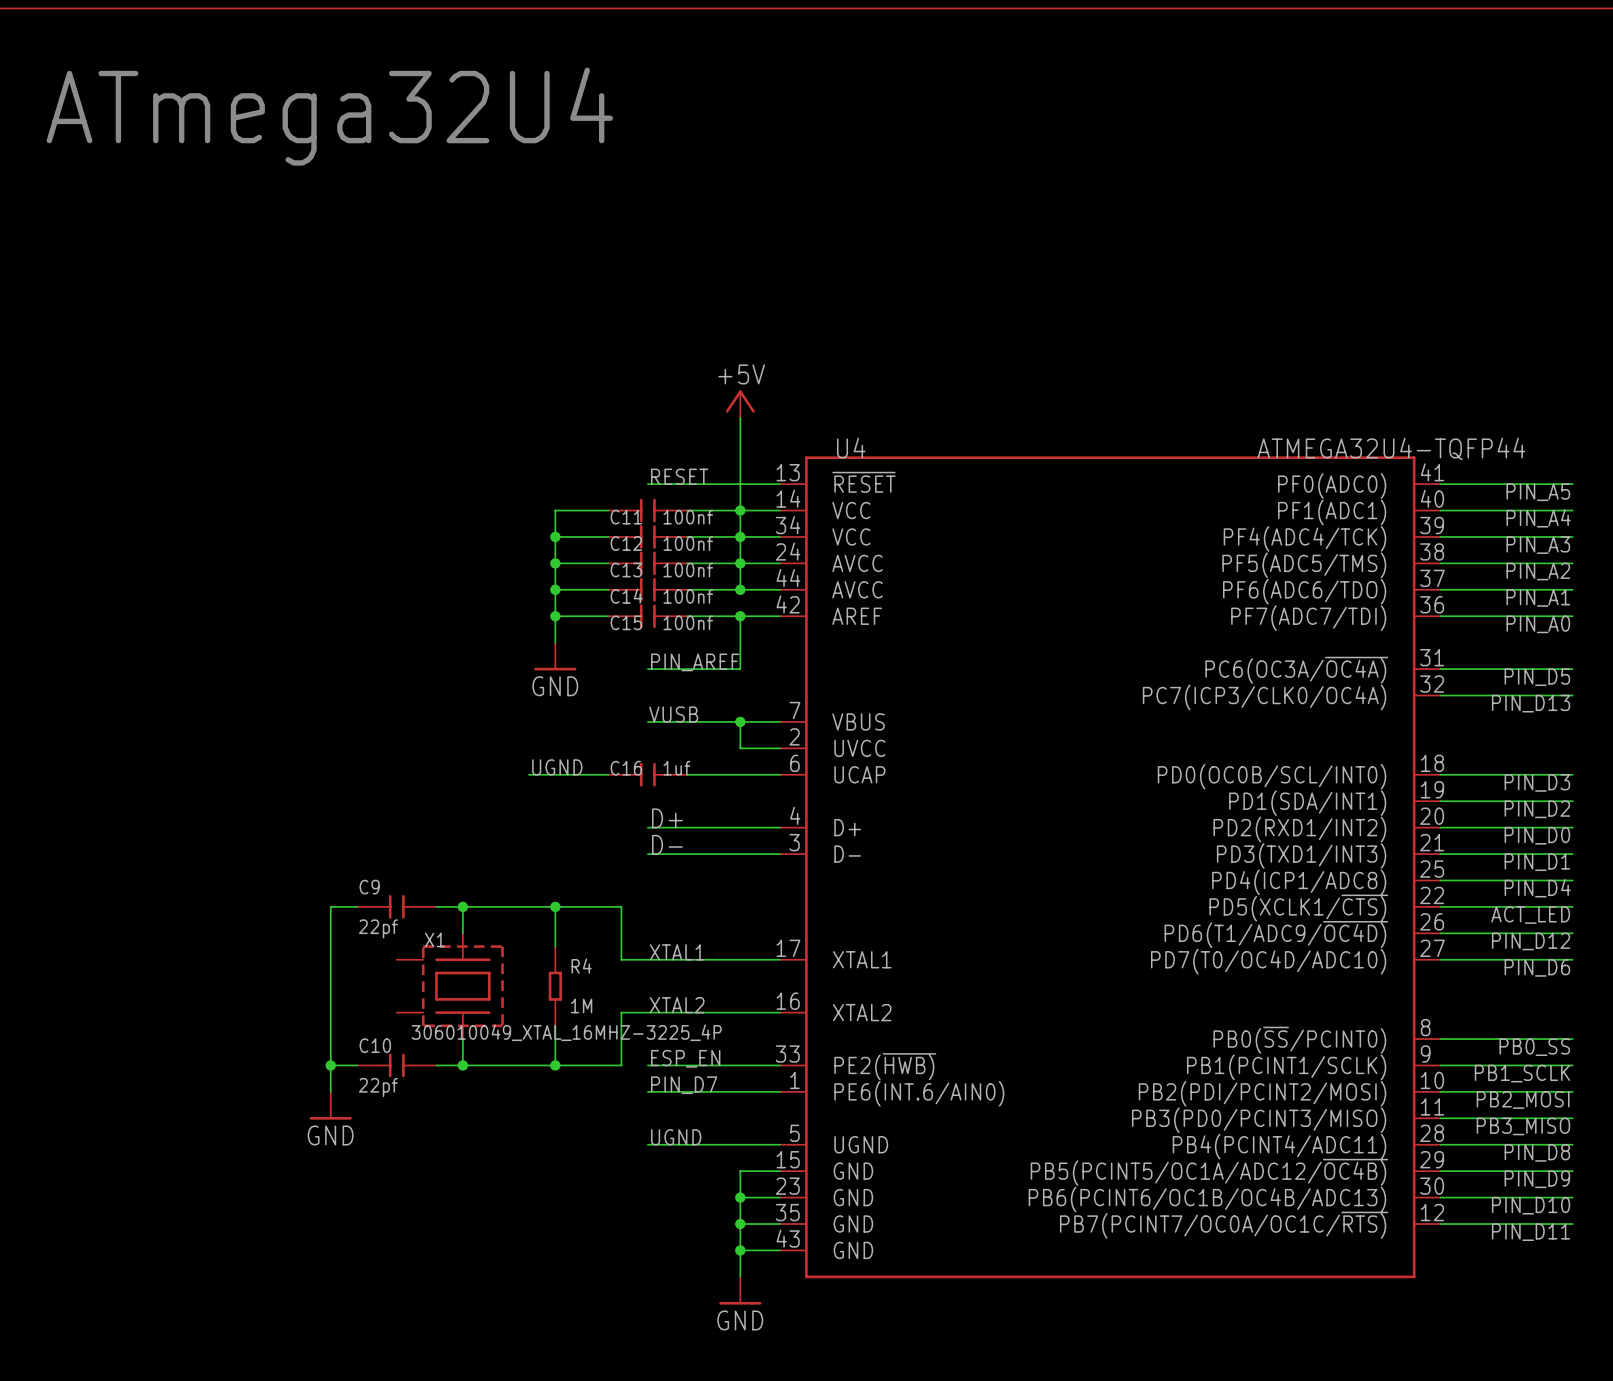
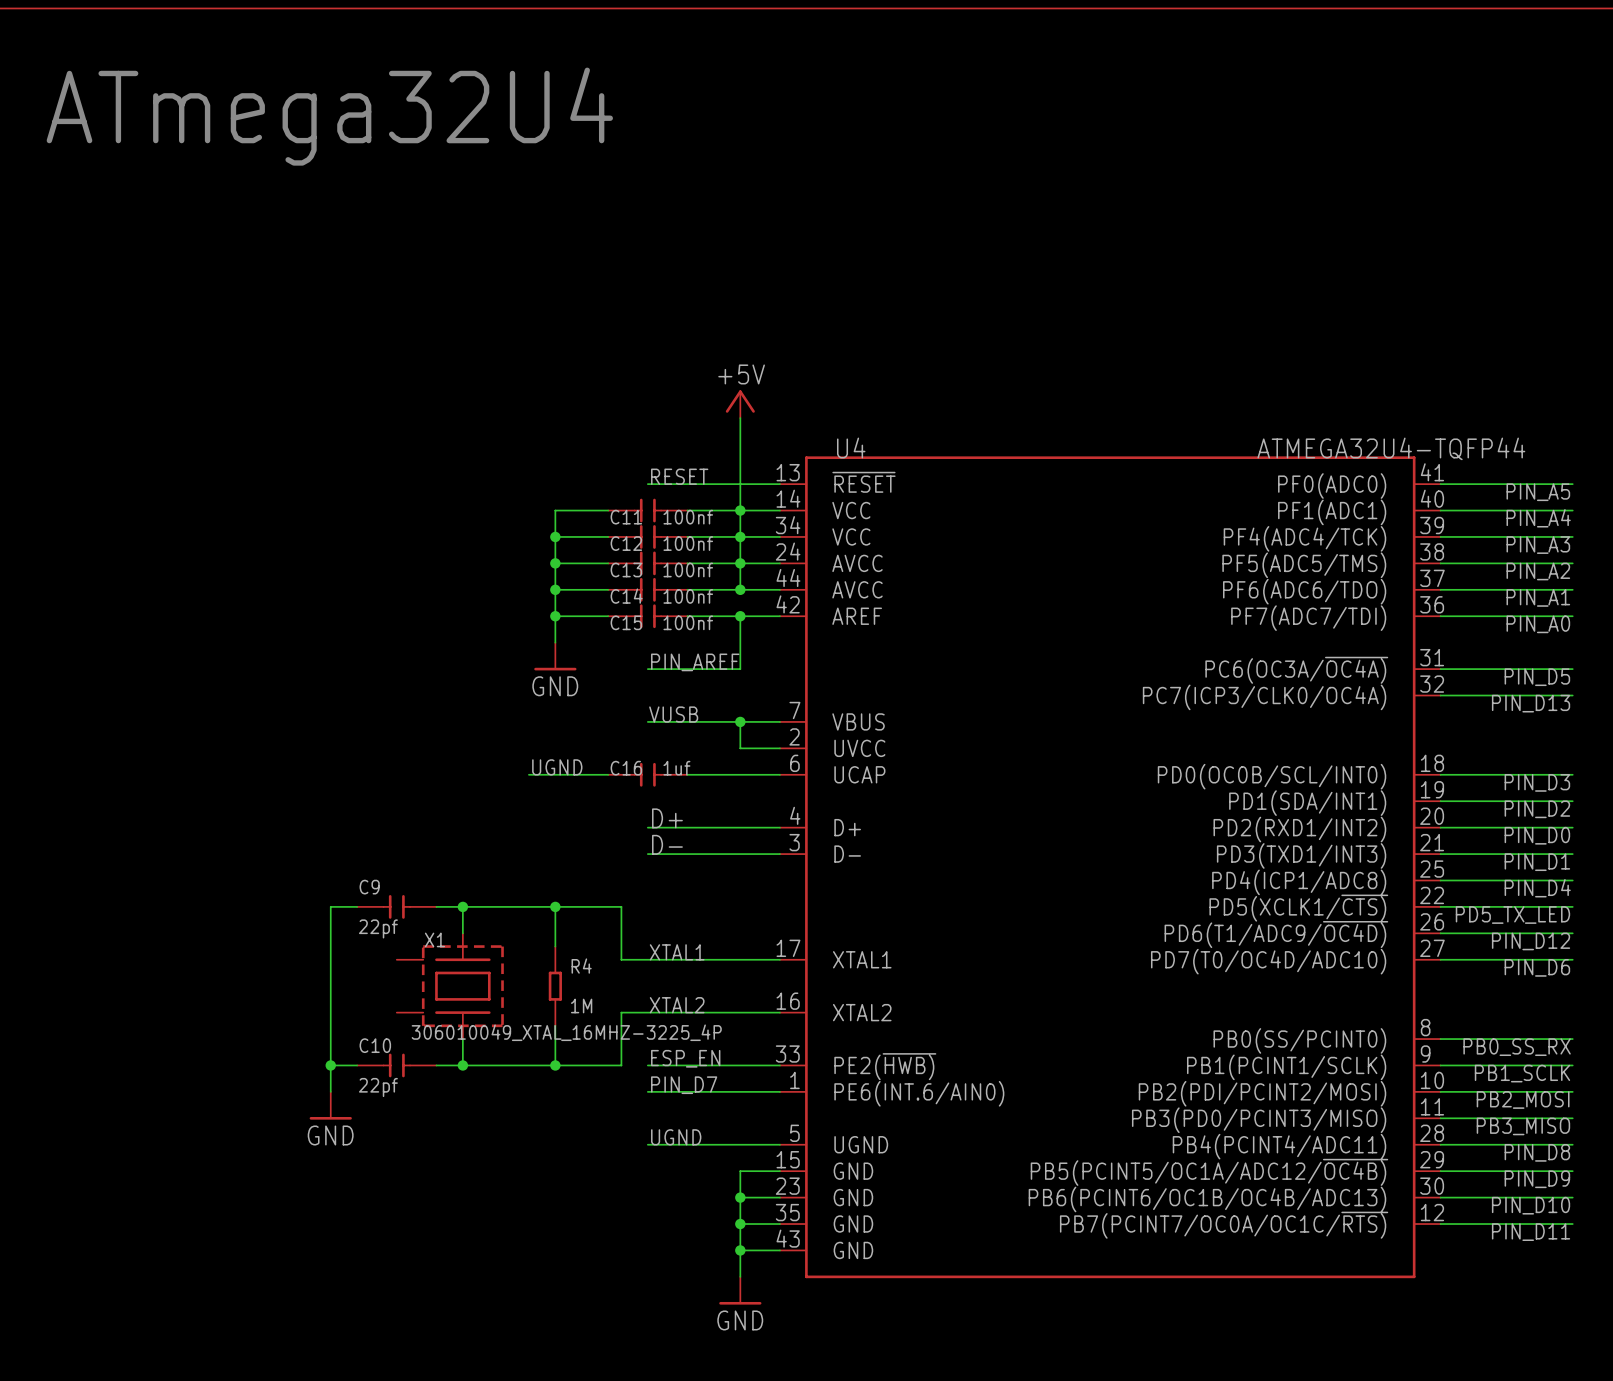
label: ACT_LED (1530, 915) -> PD5_TX_LED (1512, 915)
U4 pin name: PB0(~{SS}/PCINT0) (1299, 1040) -> PB0(SS/PCINT0) (1299, 1040)
label: PB0_SS (1534, 1047) -> PB0_SS_RX (1517, 1047)

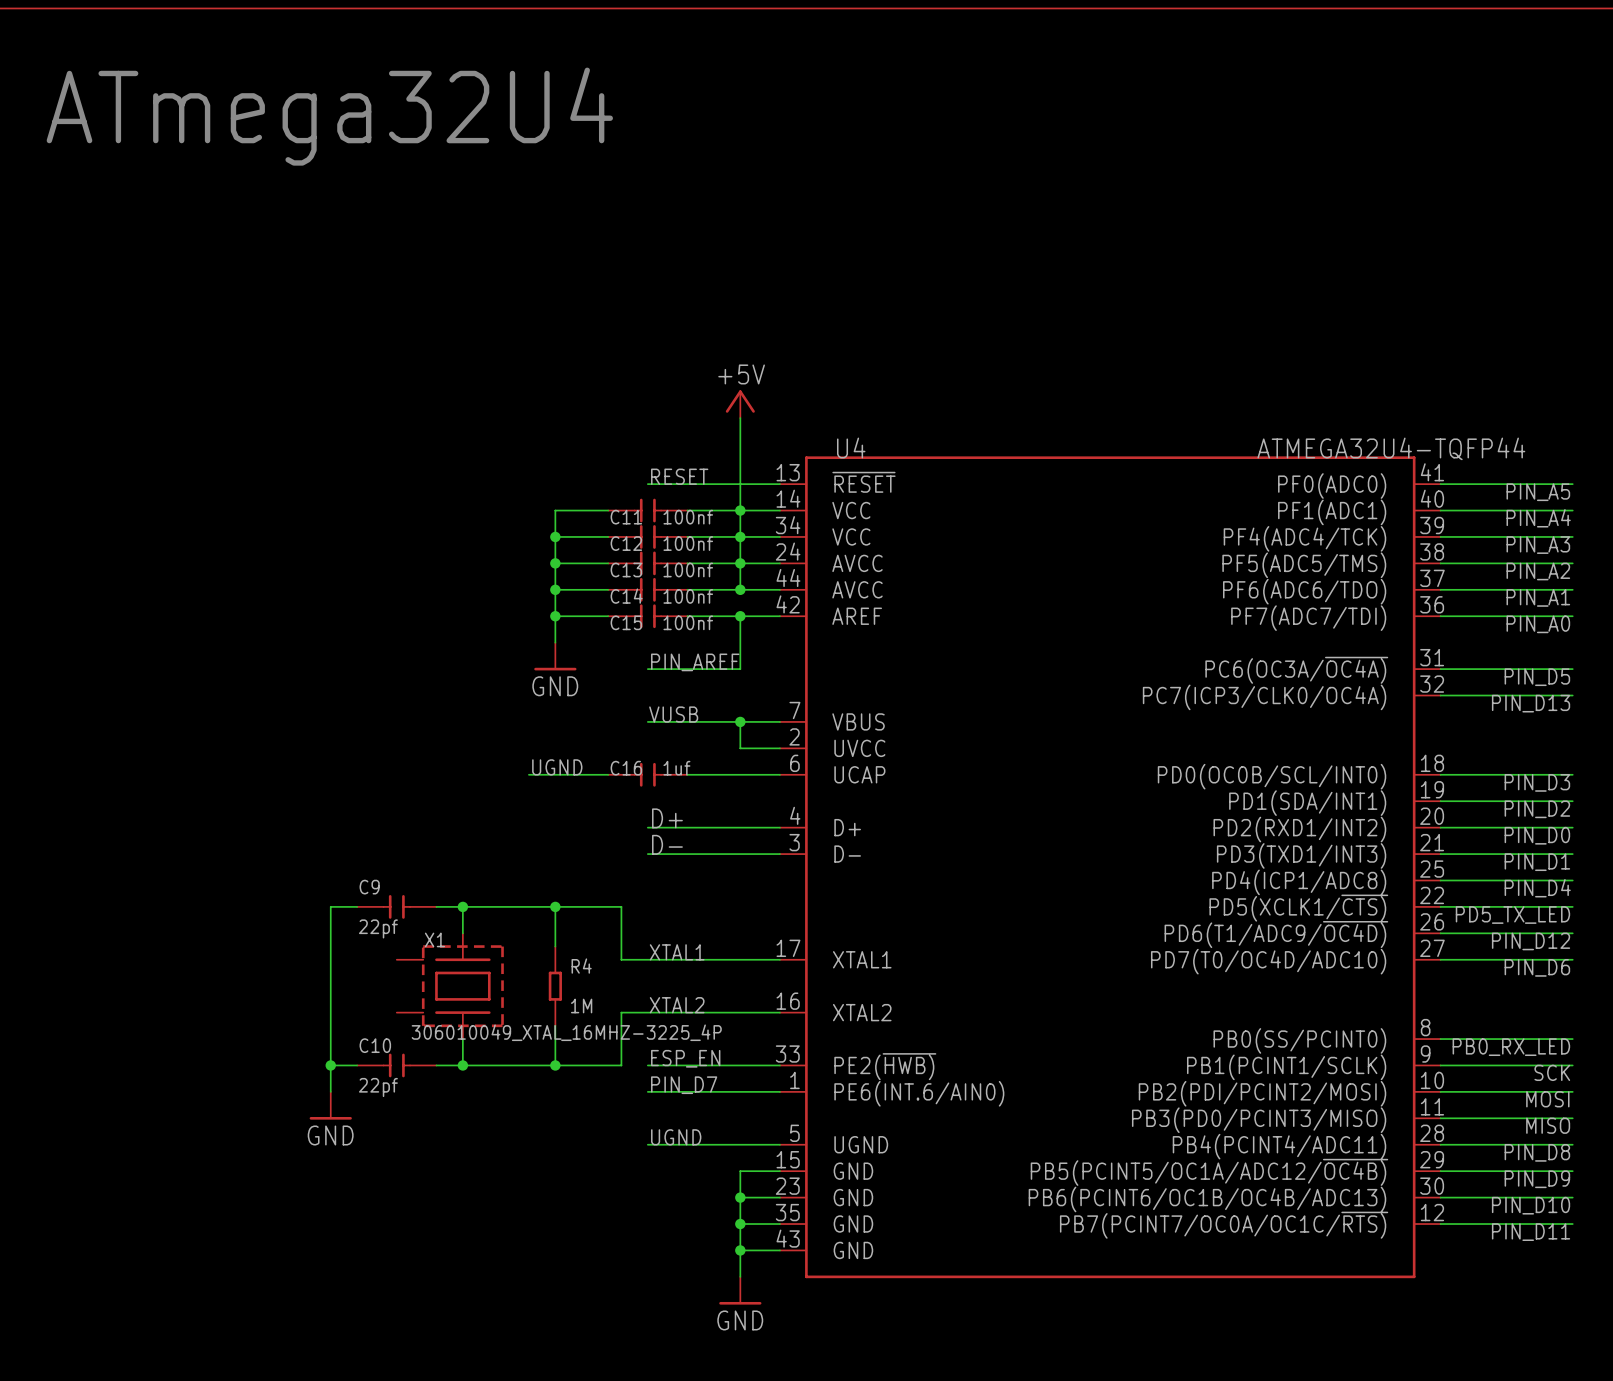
label: PB0_SS_RX (1517, 1047) -> PB0_RX_LED (1511, 1047)
label: PB1_SCLK (1522, 1073) -> SCK (1552, 1072)
label: PB2_MOSI (1523, 1099) -> MOSI (1547, 1099)
label: PB3_MISO (1523, 1126) -> MISO (1548, 1125)

